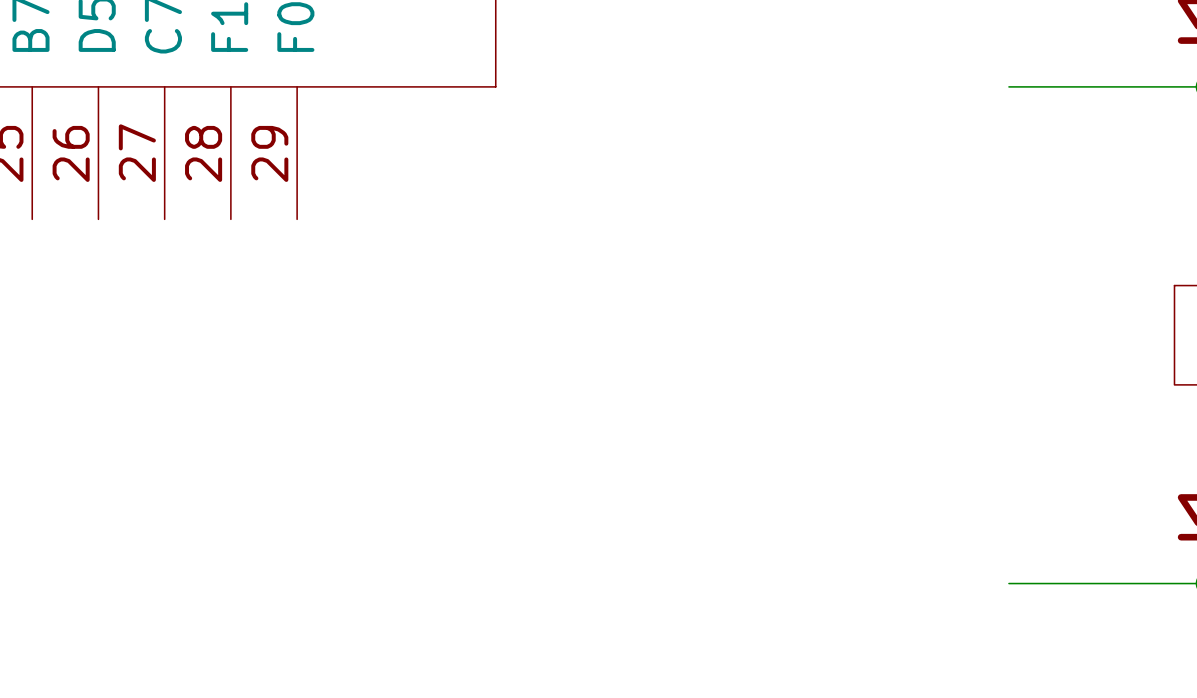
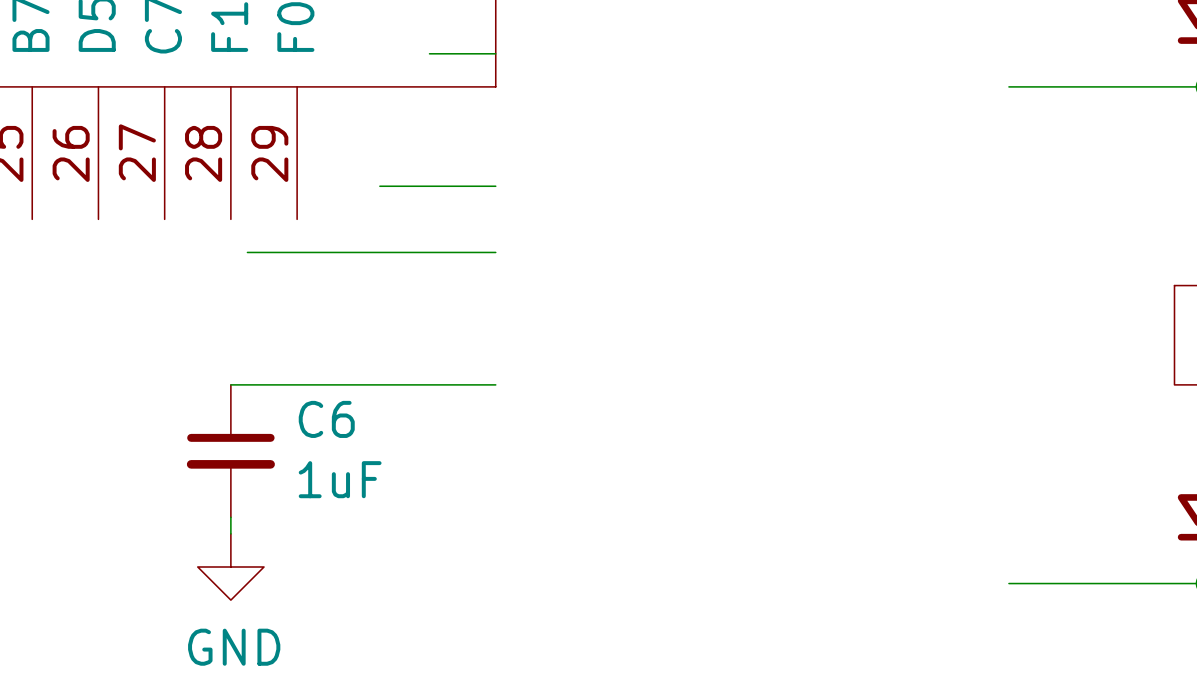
wire: none -> (429, 53) (495, 53)
wire: none -> (379, 186) (495, 186)
wire: none -> (247, 252) (495, 252)
wire: none -> (230, 384) (495, 384)
C6: none -> 1uF (230, 451)
wire: none -> (230, 517) (230, 533)
power symbol: none -> GND (230, 566)

